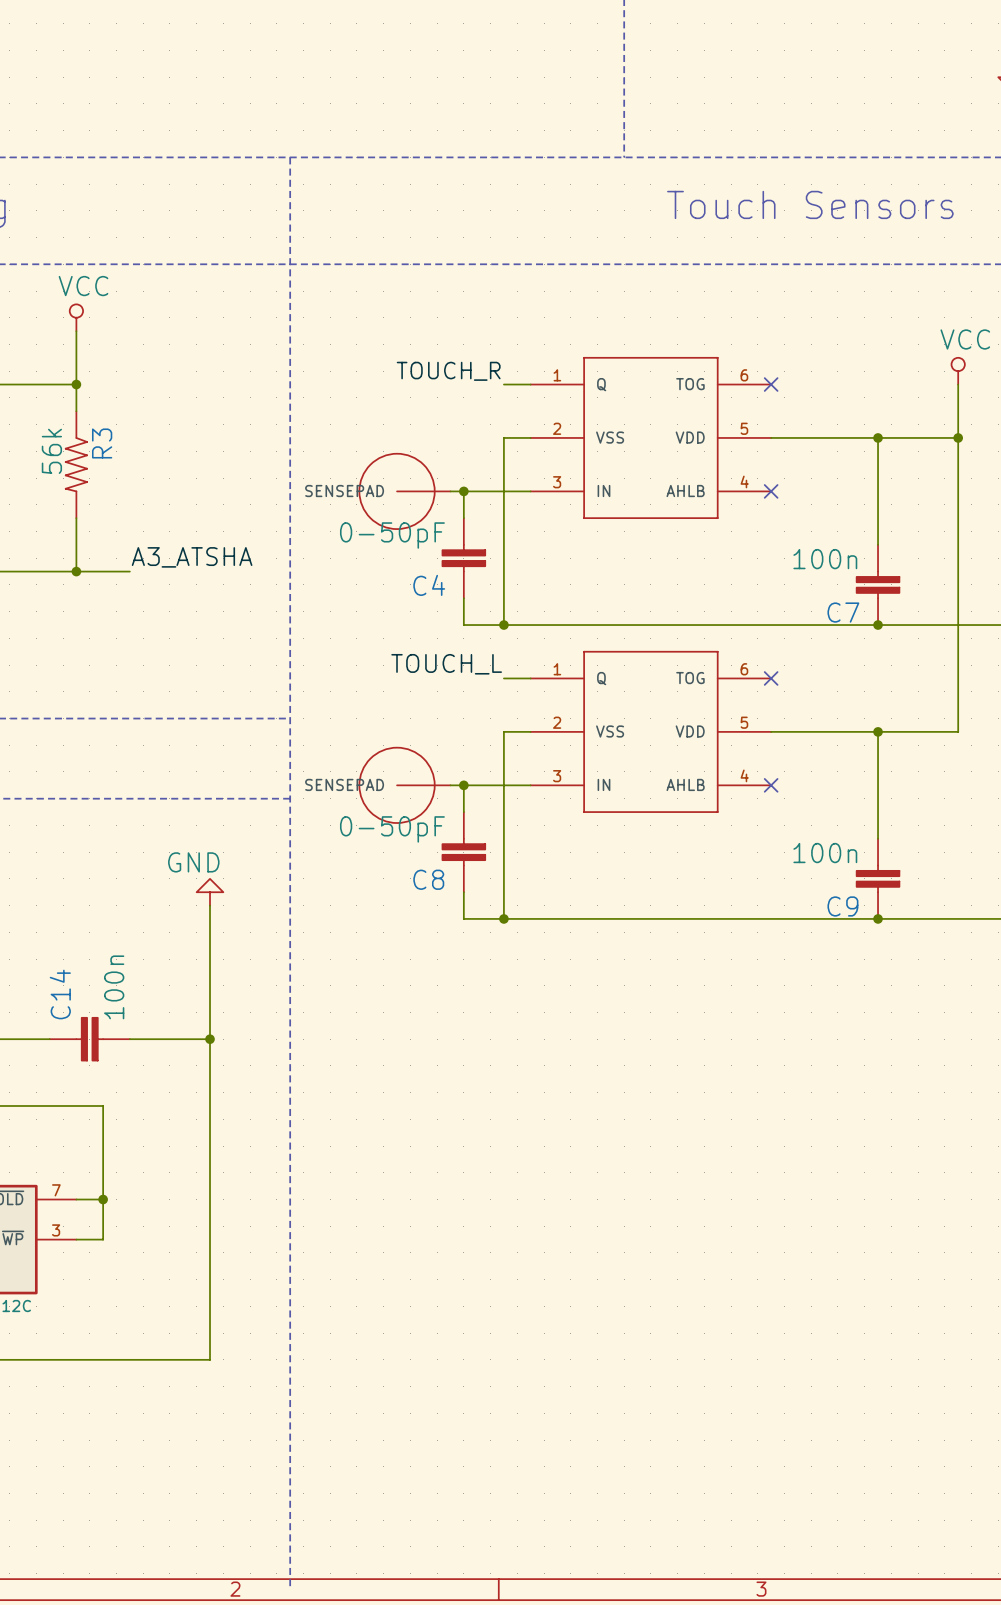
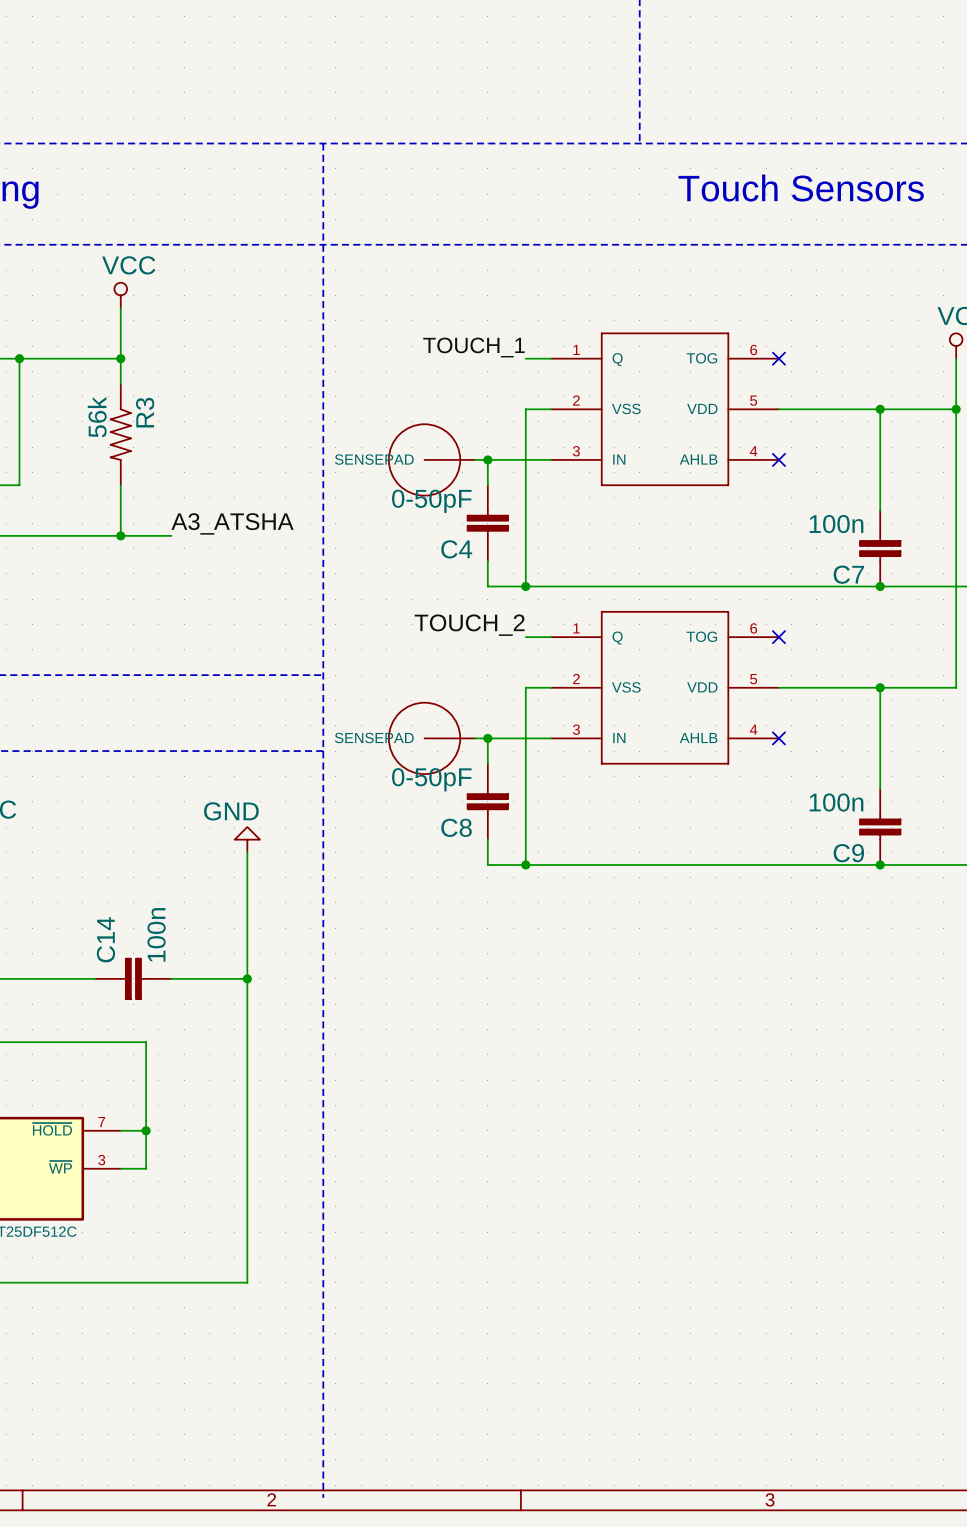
label: TOUCH_R (448, 371) -> TOUCH_1 (473, 347)
label: TOUCH_L (446, 664) -> TOUCH_2 (469, 625)

